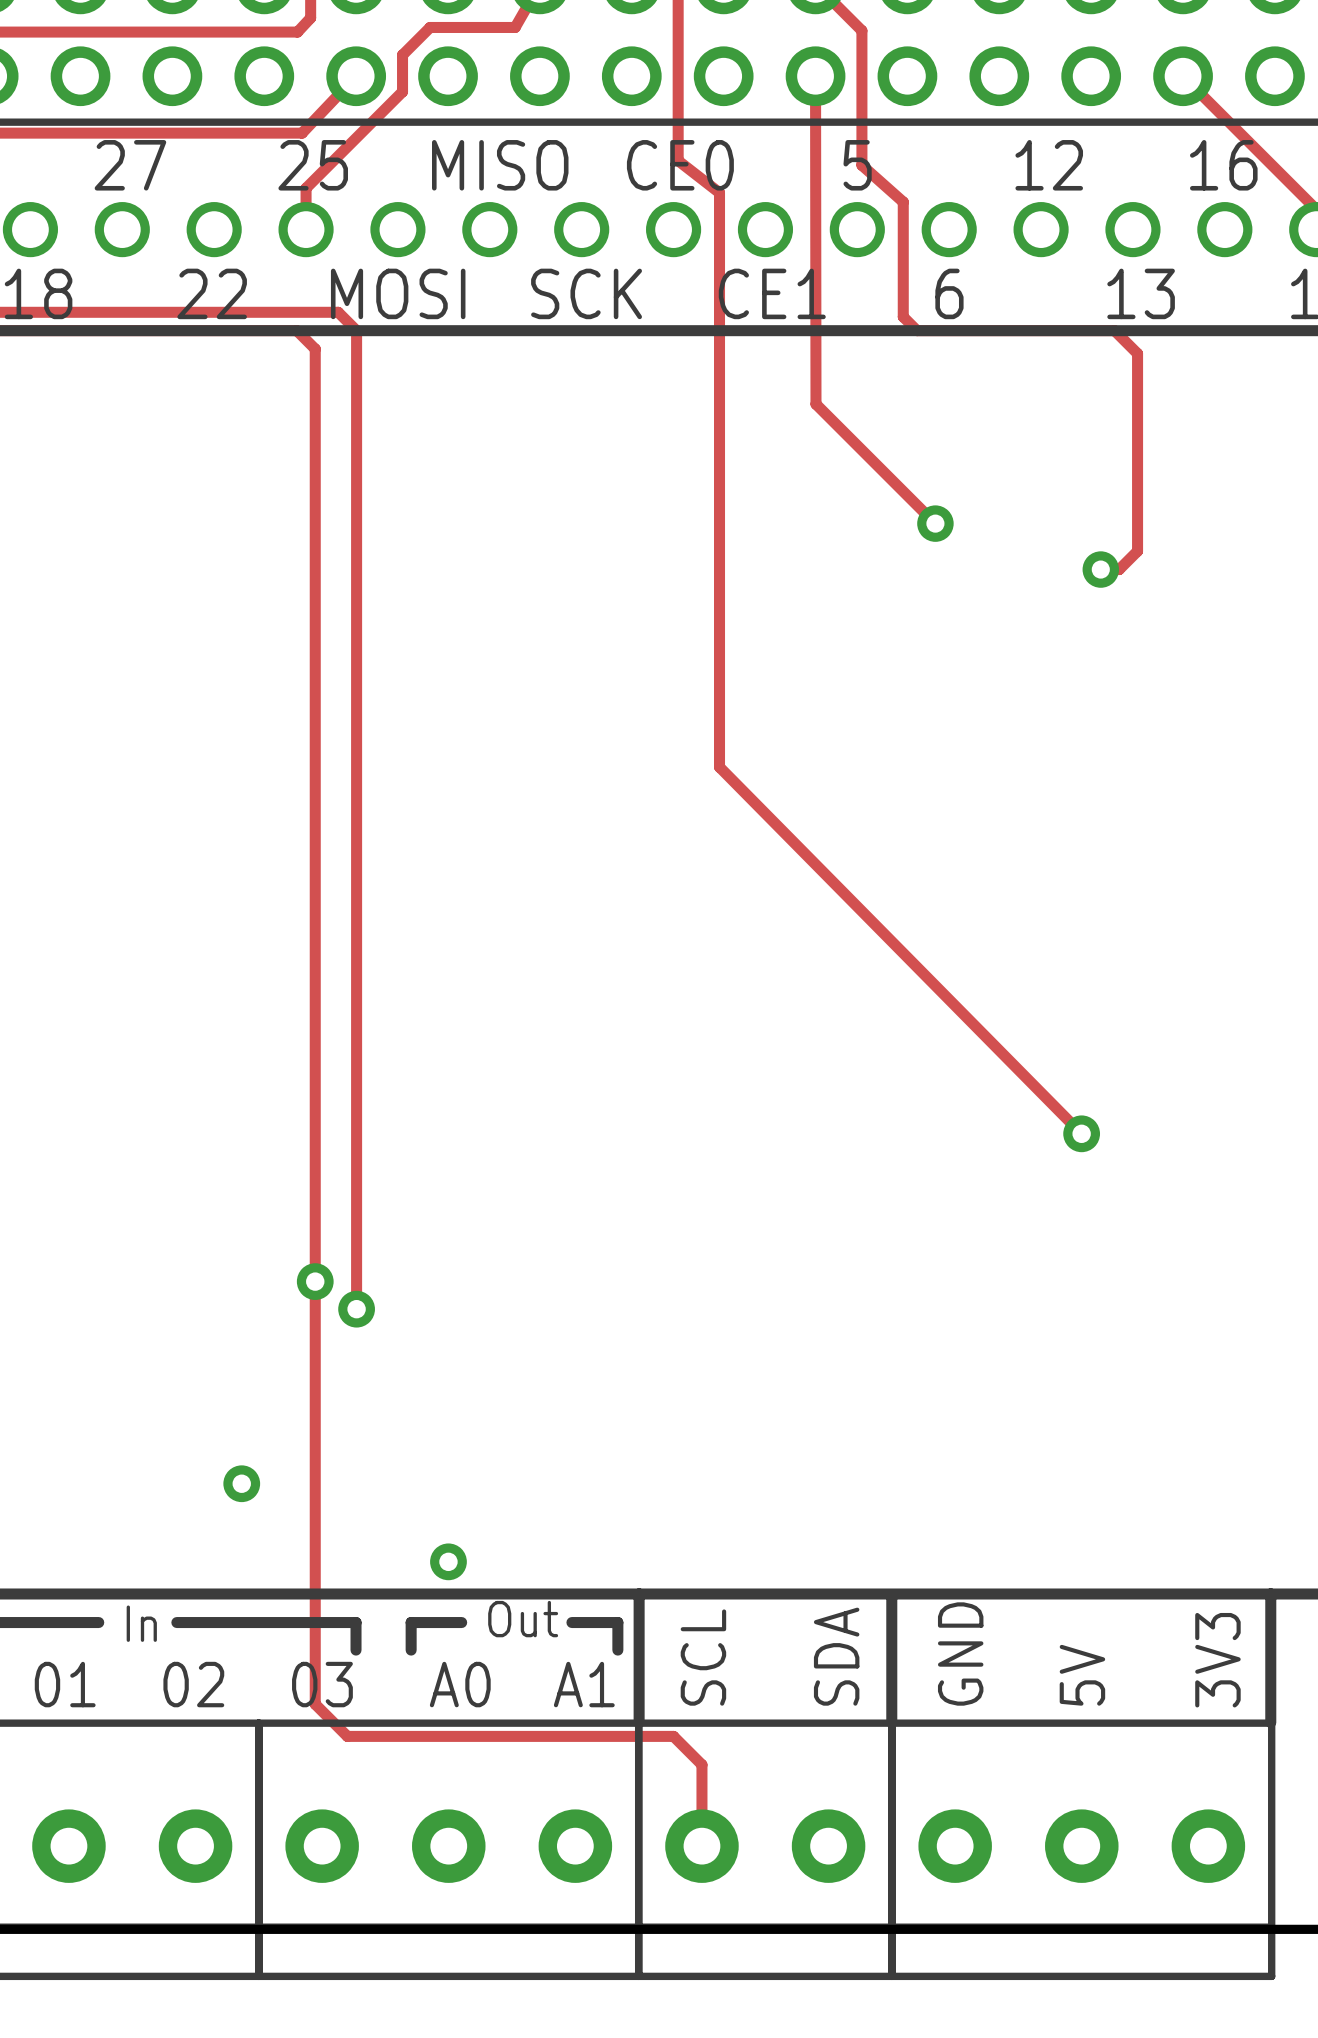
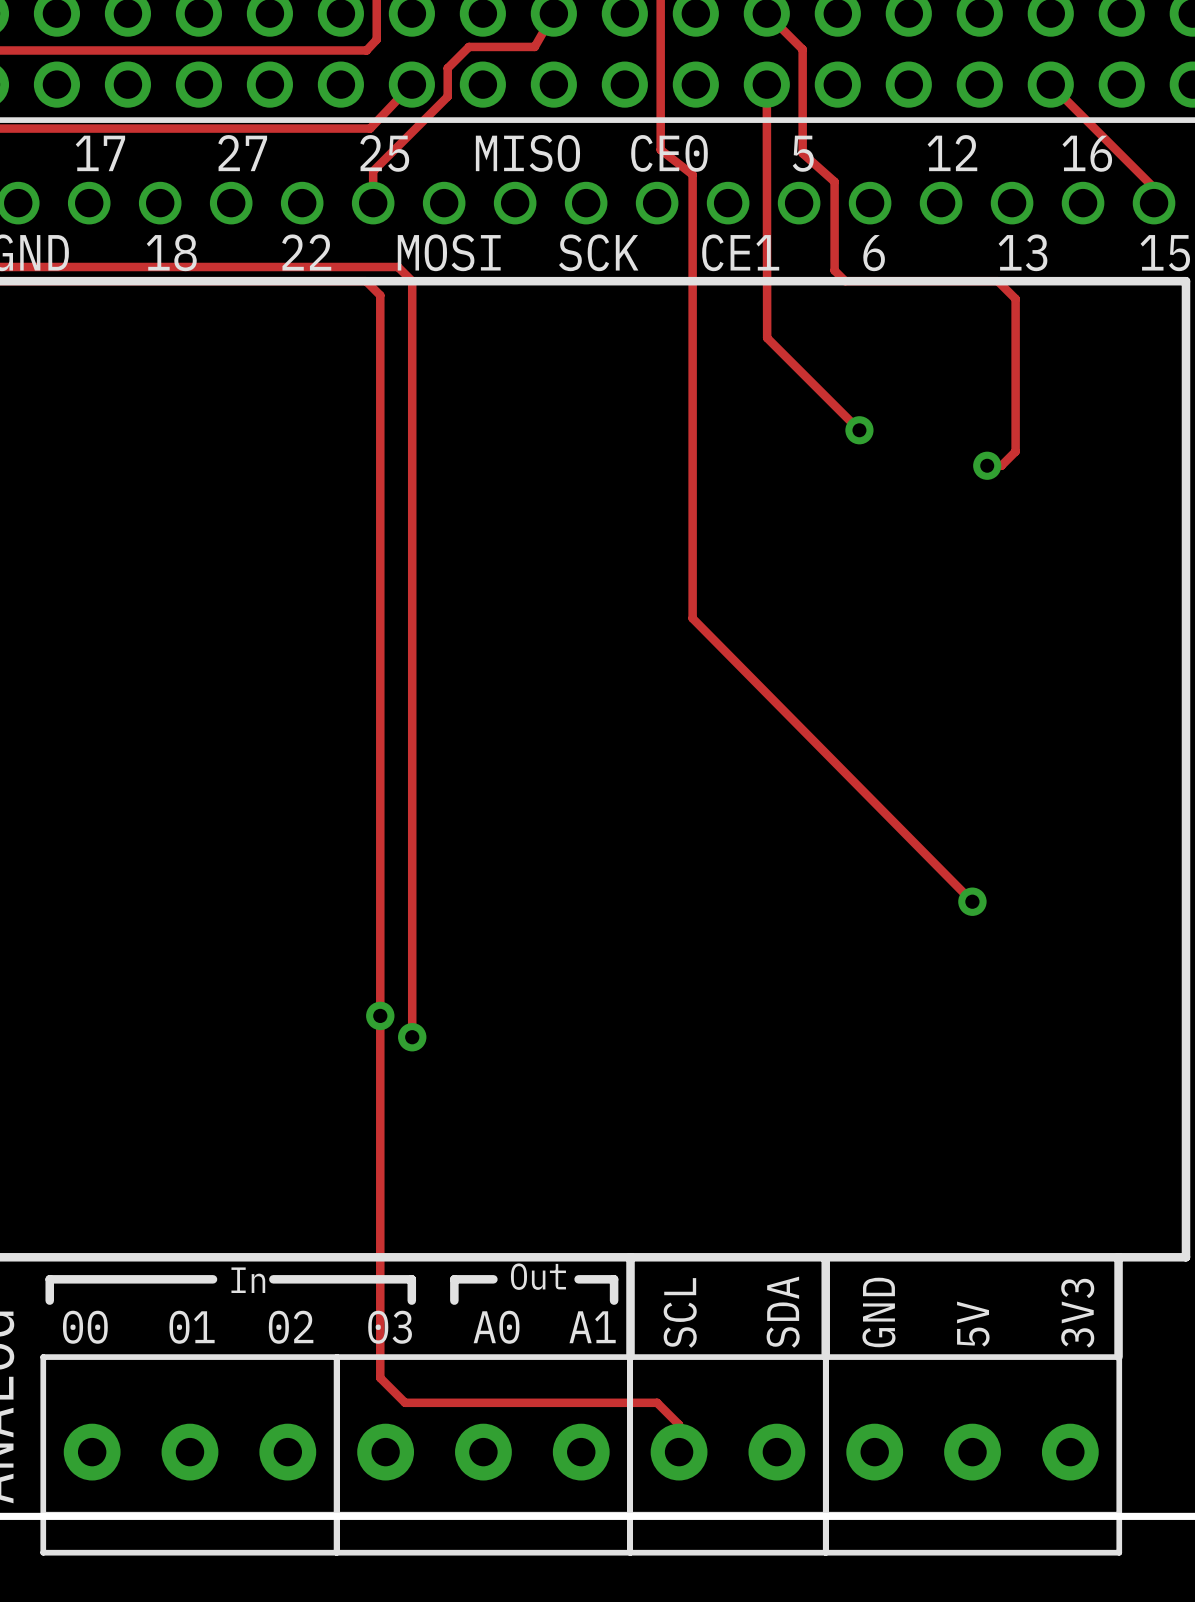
via: (241, 1483) -> none
via: (448, 1561) -> none
track: (315, 1704) (347, 1736) (673, 1736) (701, 1764) (701, 1810) -> (380, 1342) (380, 1377) (405, 1402) (657, 1402) (679, 1424)

